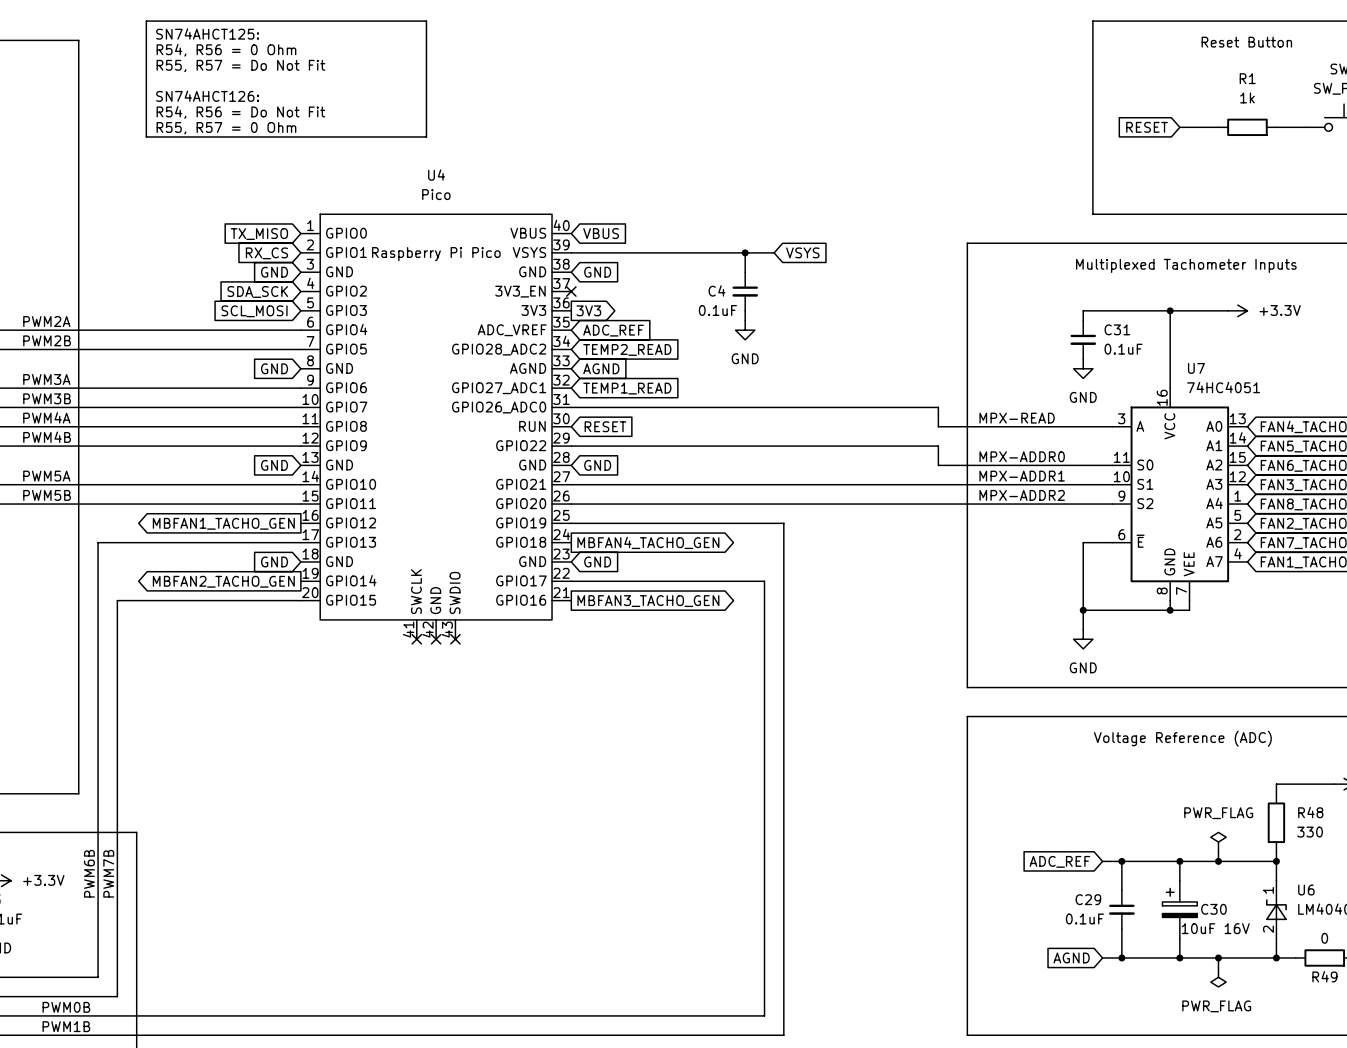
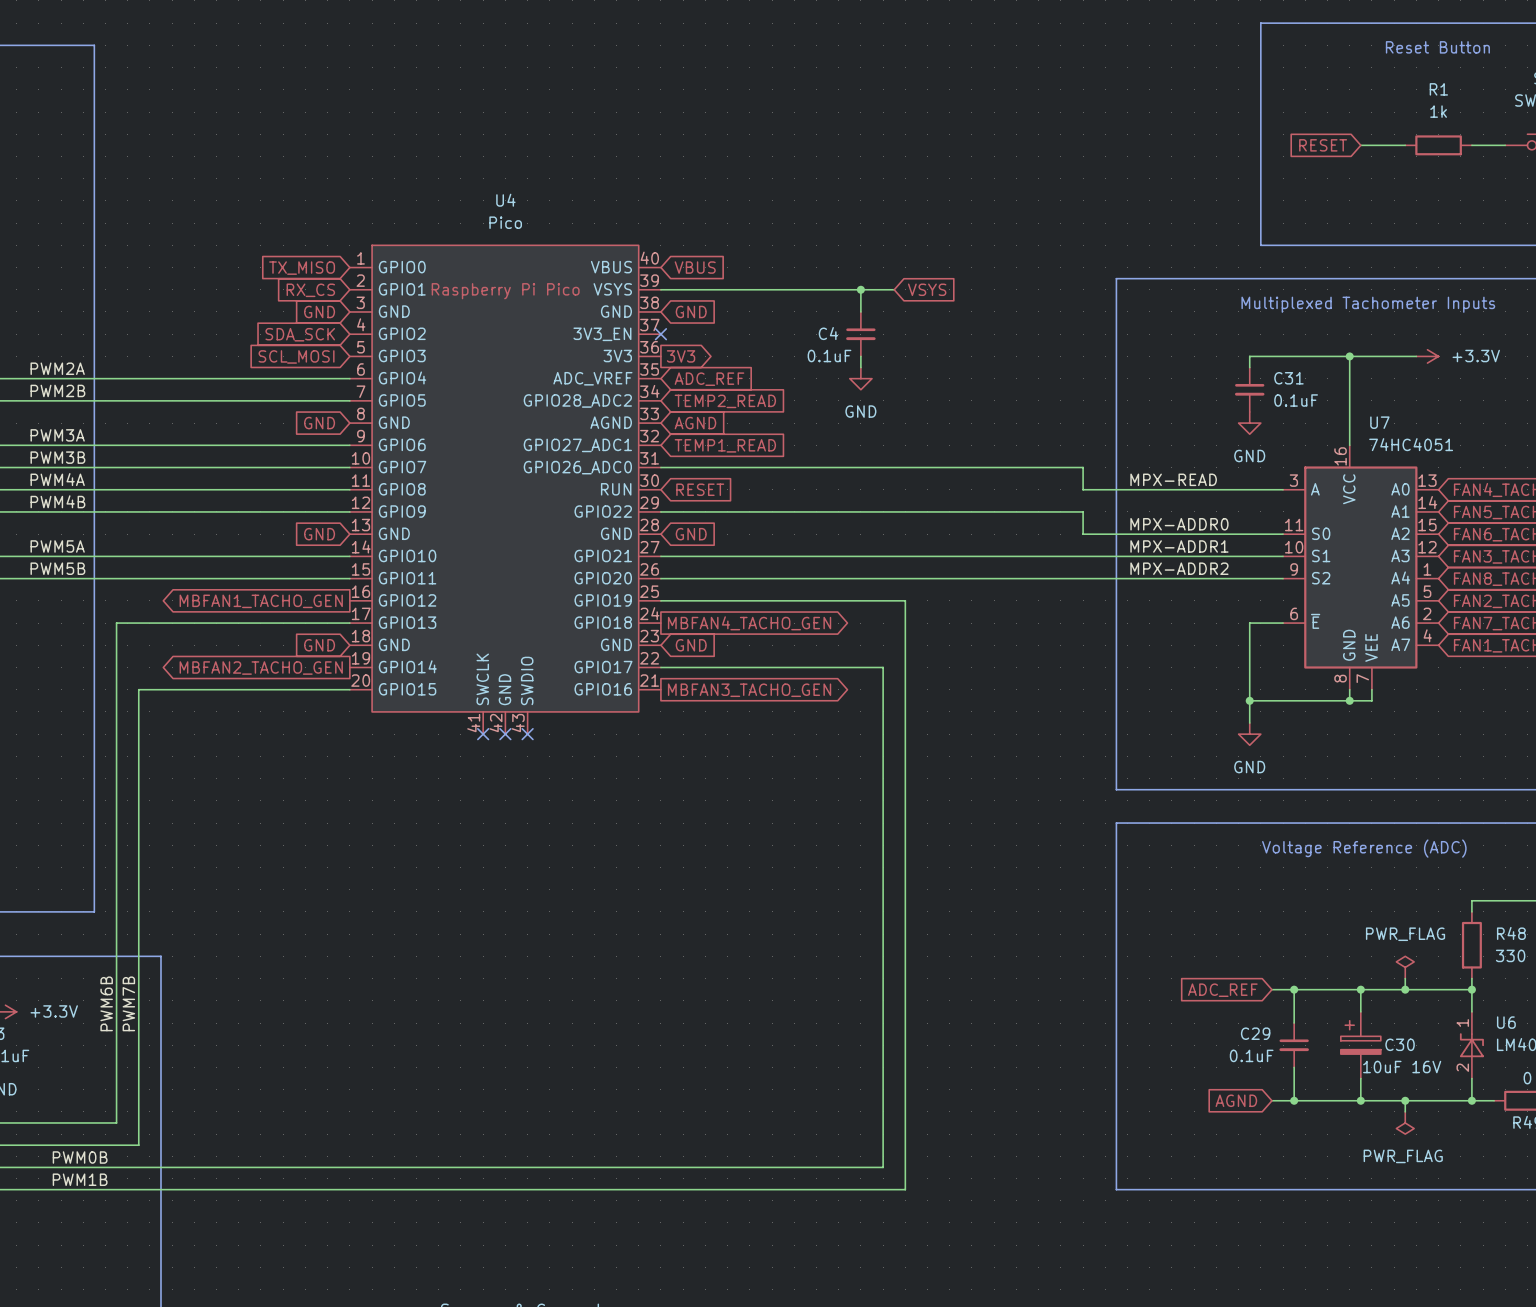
line: (146, 21) (426, 21) (426, 136) (146, 136) (146, 21) -> none
text: SN74AHCT125: (207, 33) -> none
text: R54, R56 = 0 Ohm (226, 50) -> none
text: R55, R57 = Do Not Fit (240, 65) -> none
text: SN74AHCT126: (207, 96) -> none
text: R54, R56 = Do Not Fit (240, 112) -> none
text: R55, R57 = 0 Ohm (226, 128) -> none

